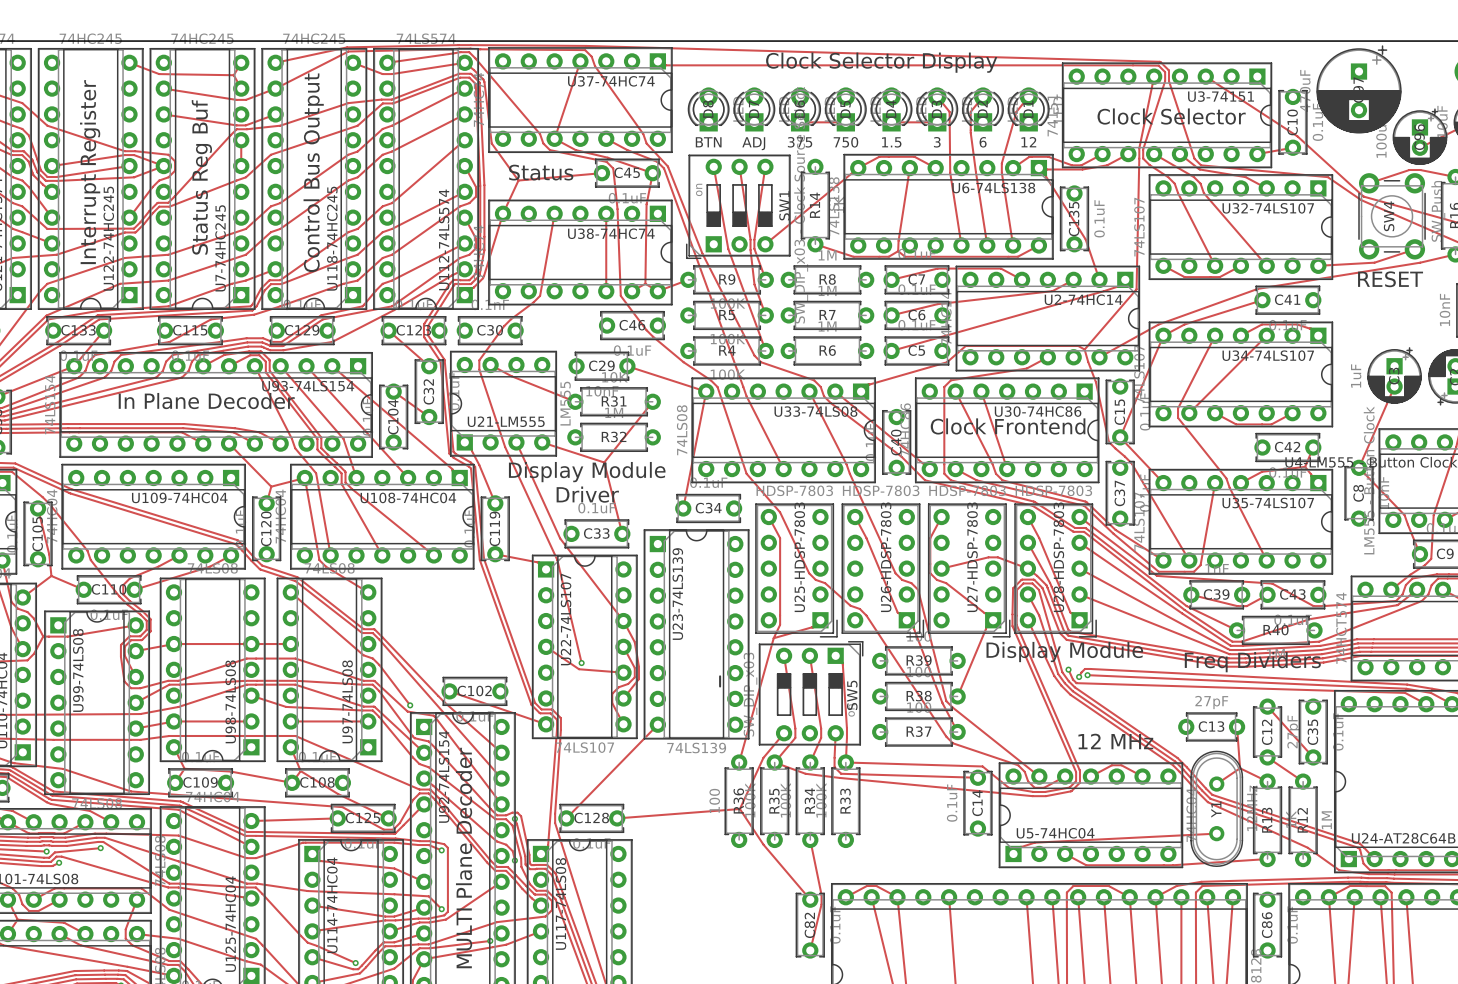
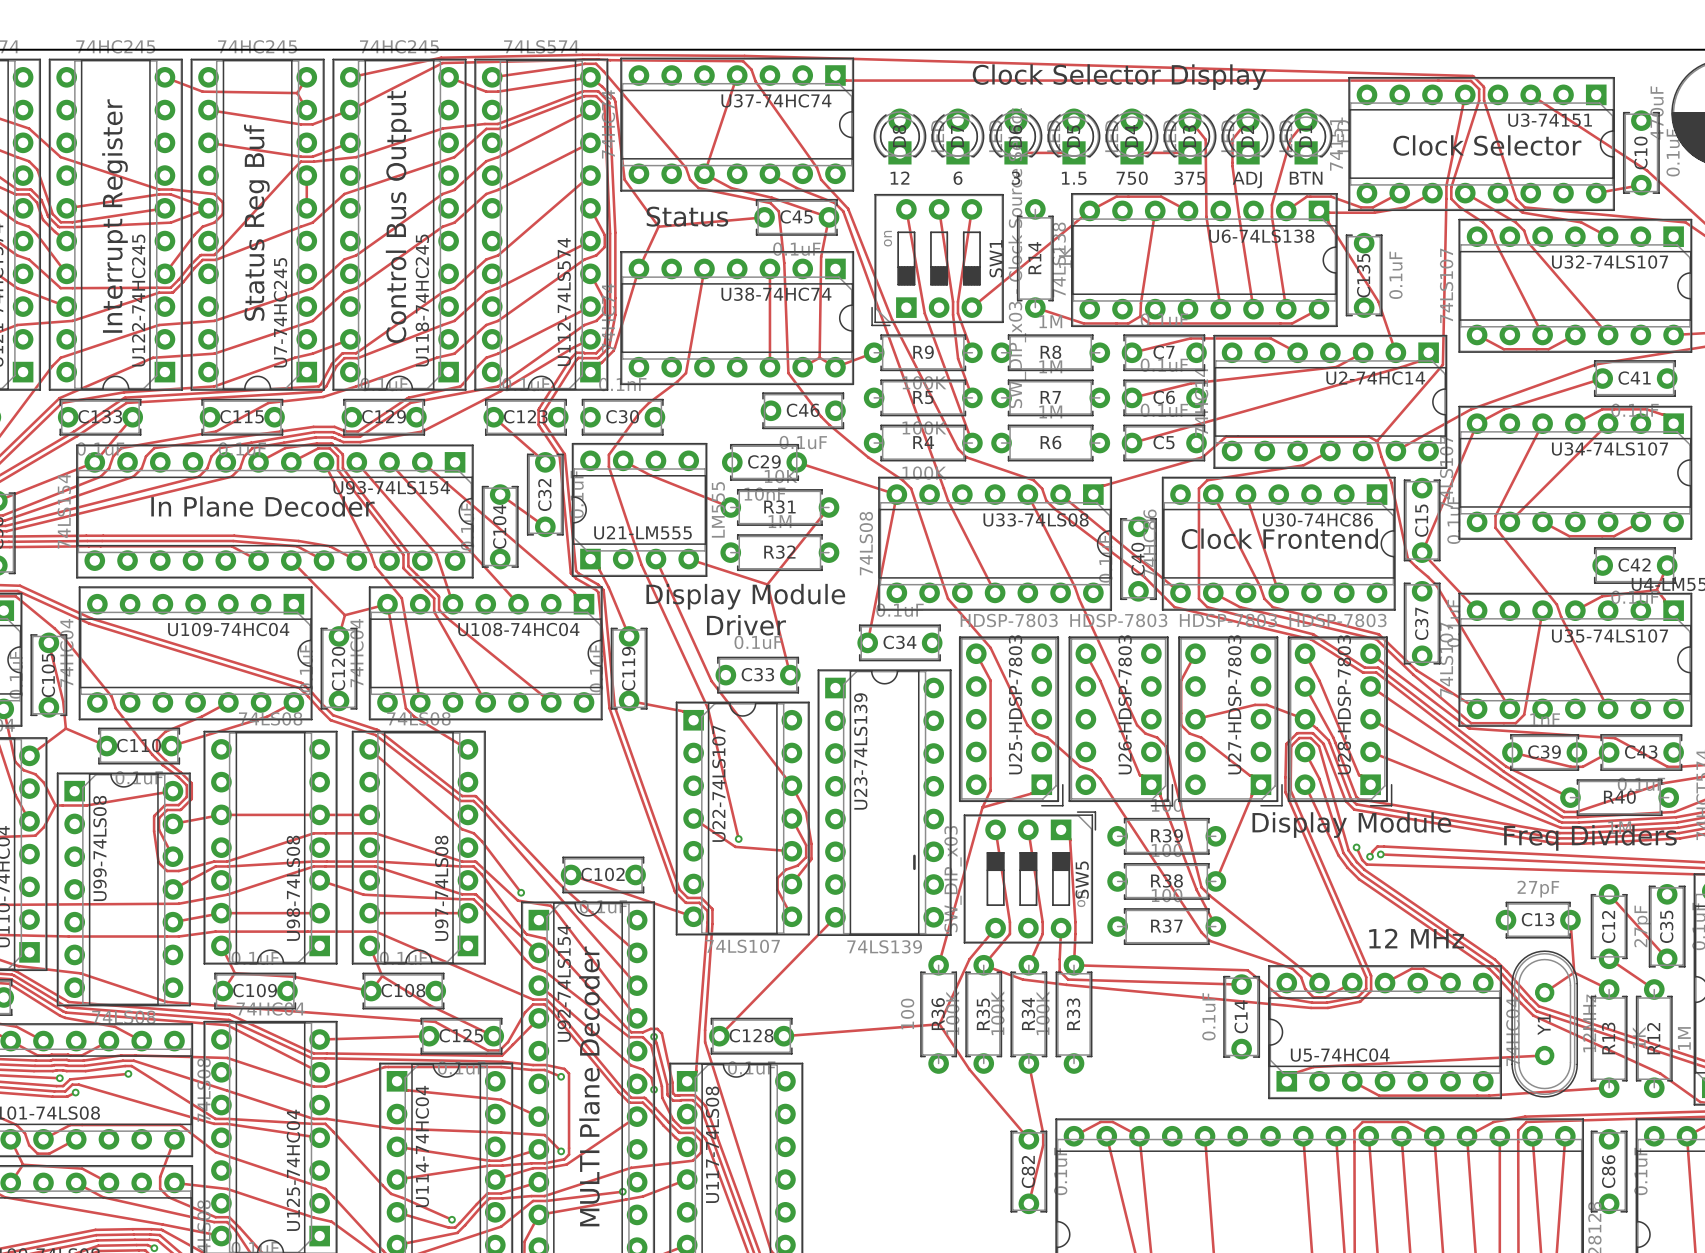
text: BTN (708, 142) -> 12 (900, 178)
text: 375 (800, 142) -> 3 (1015, 178)
text: 750 (845, 142) -> 1.5 (1074, 178)
text: 1.5 (891, 142) -> 750 (1132, 178)
text: 3 (937, 142) -> 375 (1189, 178)
text: 6 (983, 142) -> ADJ (1247, 179)
text: 12 (1028, 142) -> BTN (1306, 178)
text: ADJ (753, 143) -> 6 (958, 178)

